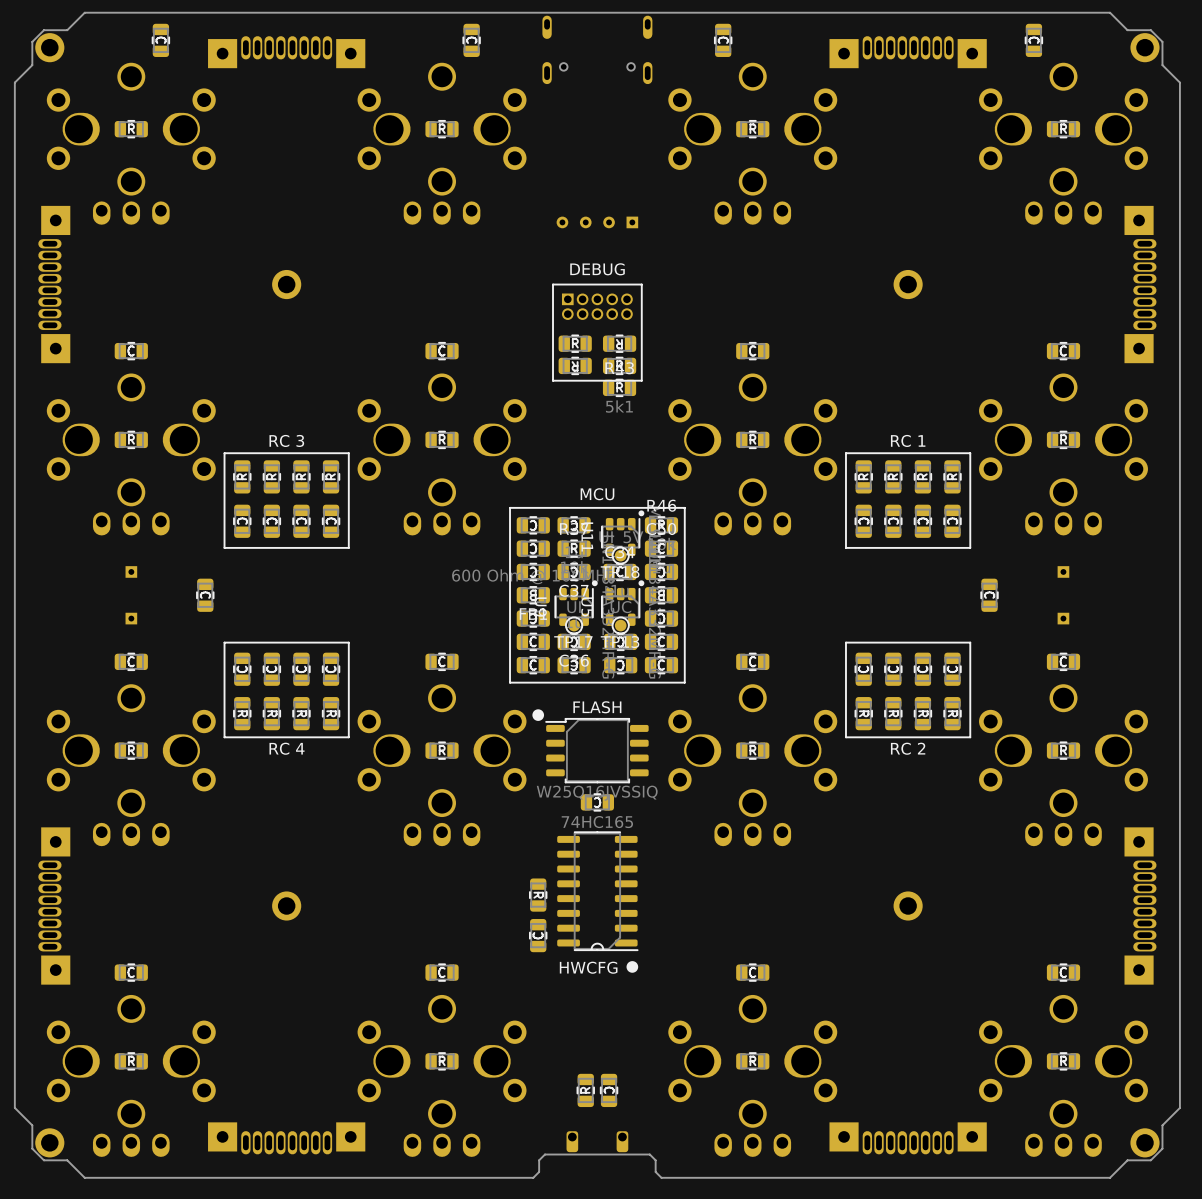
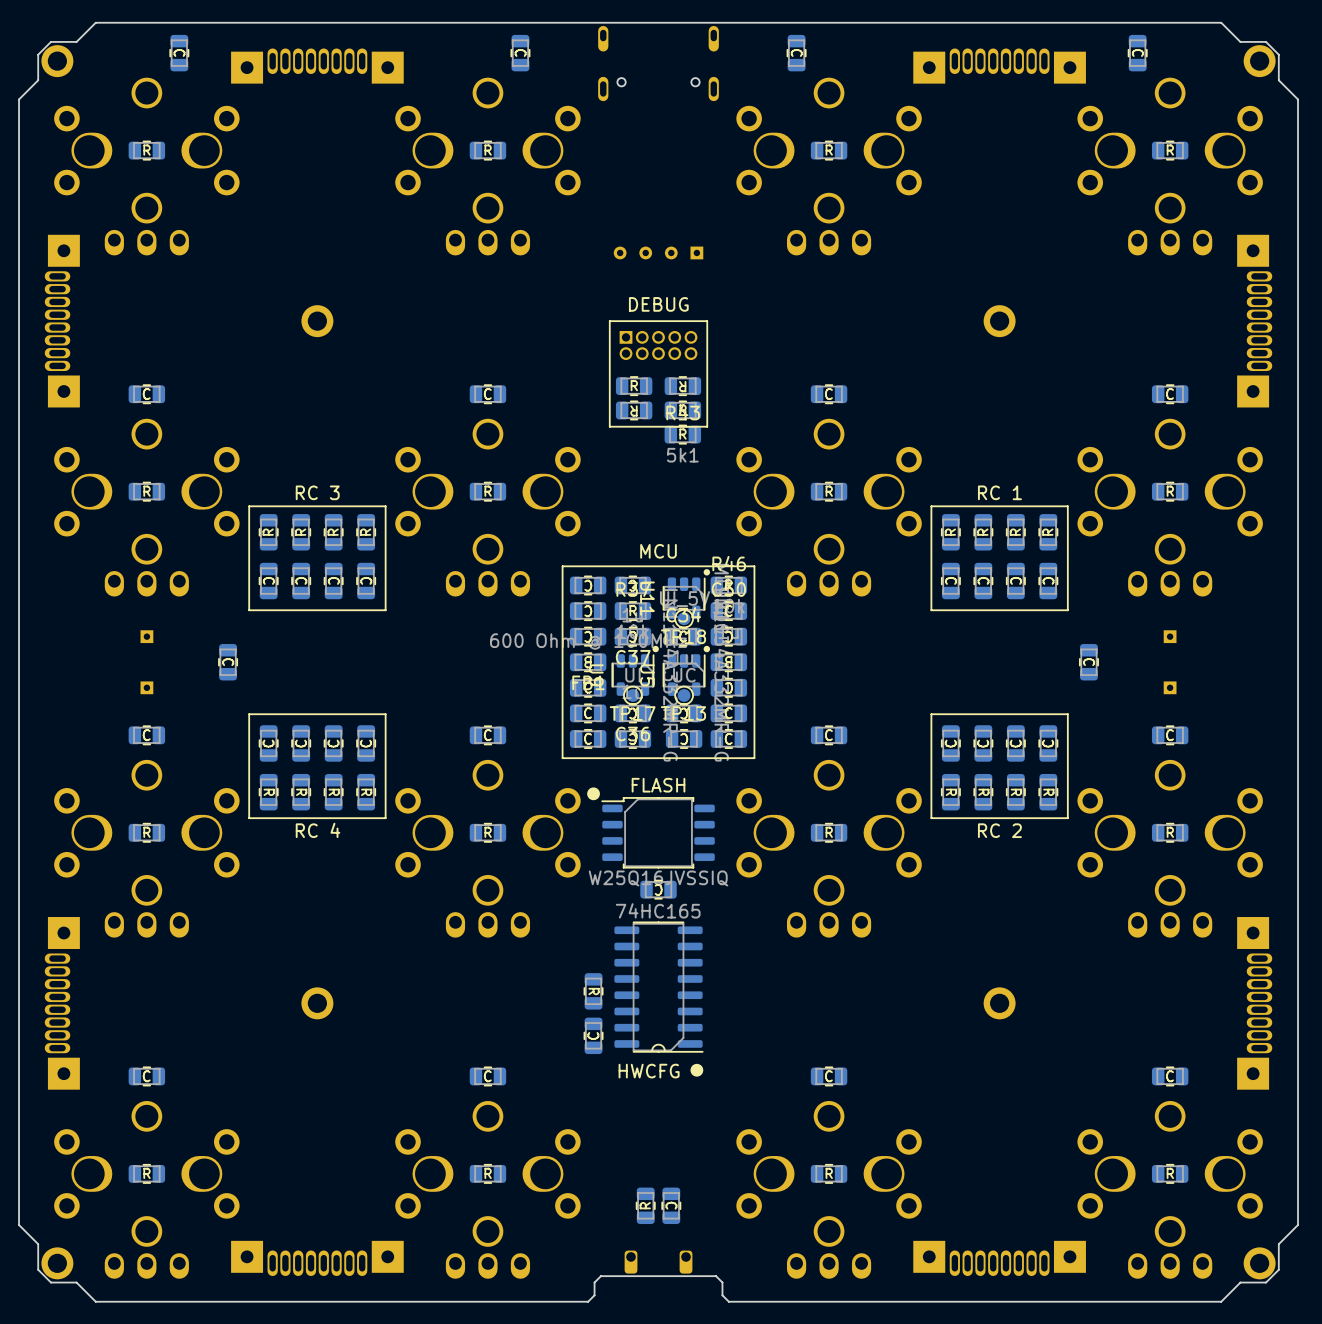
part rotation: 0° (533, 618) -> 180° (588, 687)

